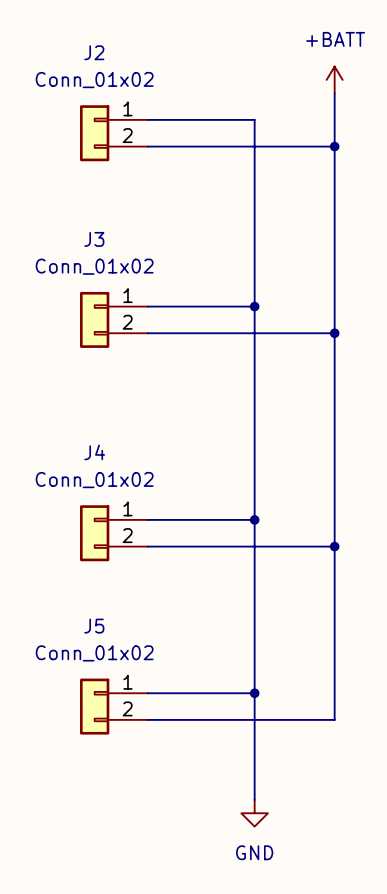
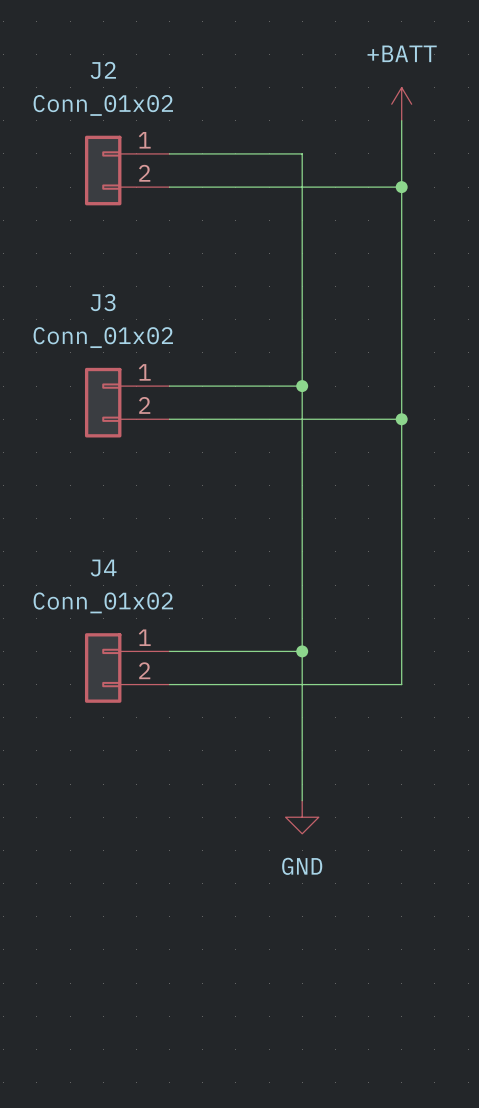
wire: (334, 546) (334, 719) (147, 719) -> none
junction: (334, 546) -> none
wire: (254, 639) (254, 799) -> none
wire: (147, 693) (254, 693) -> none
junction: (254, 693) -> none
J5: Conn_01x02 (113, 706) -> none
power symbol position: GND (254, 813) -> GND (302, 817)

